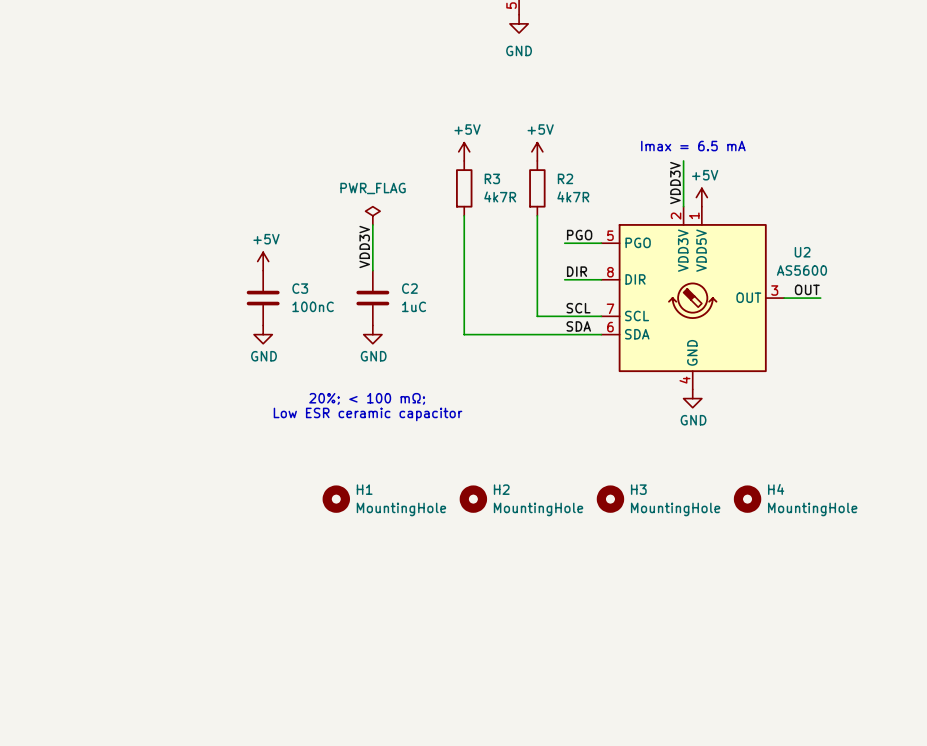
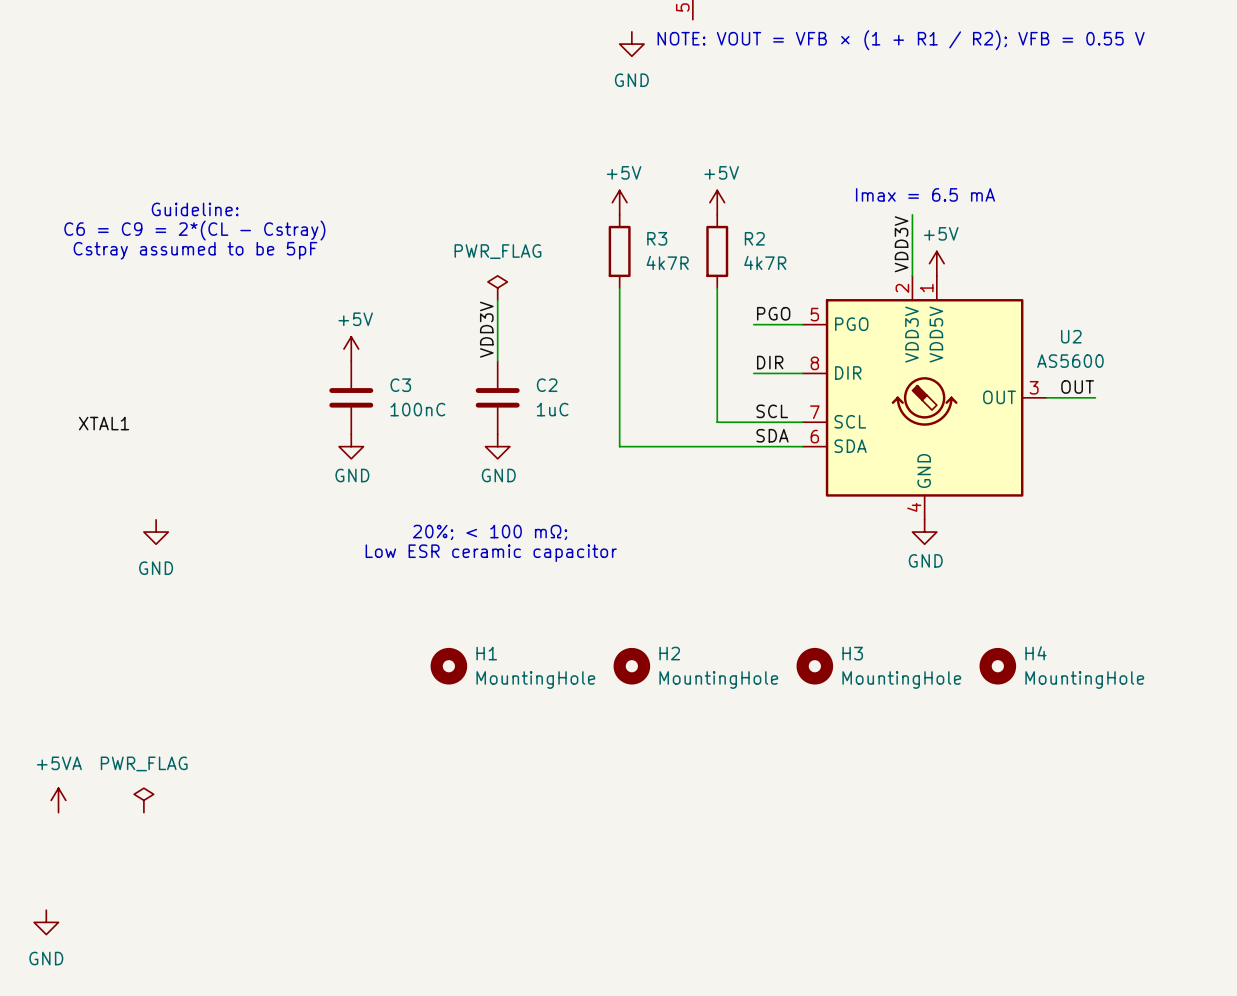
power symbol position: GND (519, 23) -> GND (631, 44)
text: none -> NOTE: VOUT = VFB × (1 + R1 / R2); VFB = 0.55 V (901, 40)
text: none -> Guideline: (195, 209)
text: none -> C6 = C9 = 2*(CL - Cstray) (194, 230)
text: none -> Cstray assumed to be 5pF (195, 250)
label: none -> XTAL1 (104, 423)
power symbol: none -> GND (156, 532)
power symbol: none -> +5VA (58, 800)
power symbol: none -> PWR_FLAG (143, 800)
power symbol: none -> GND (46, 922)

